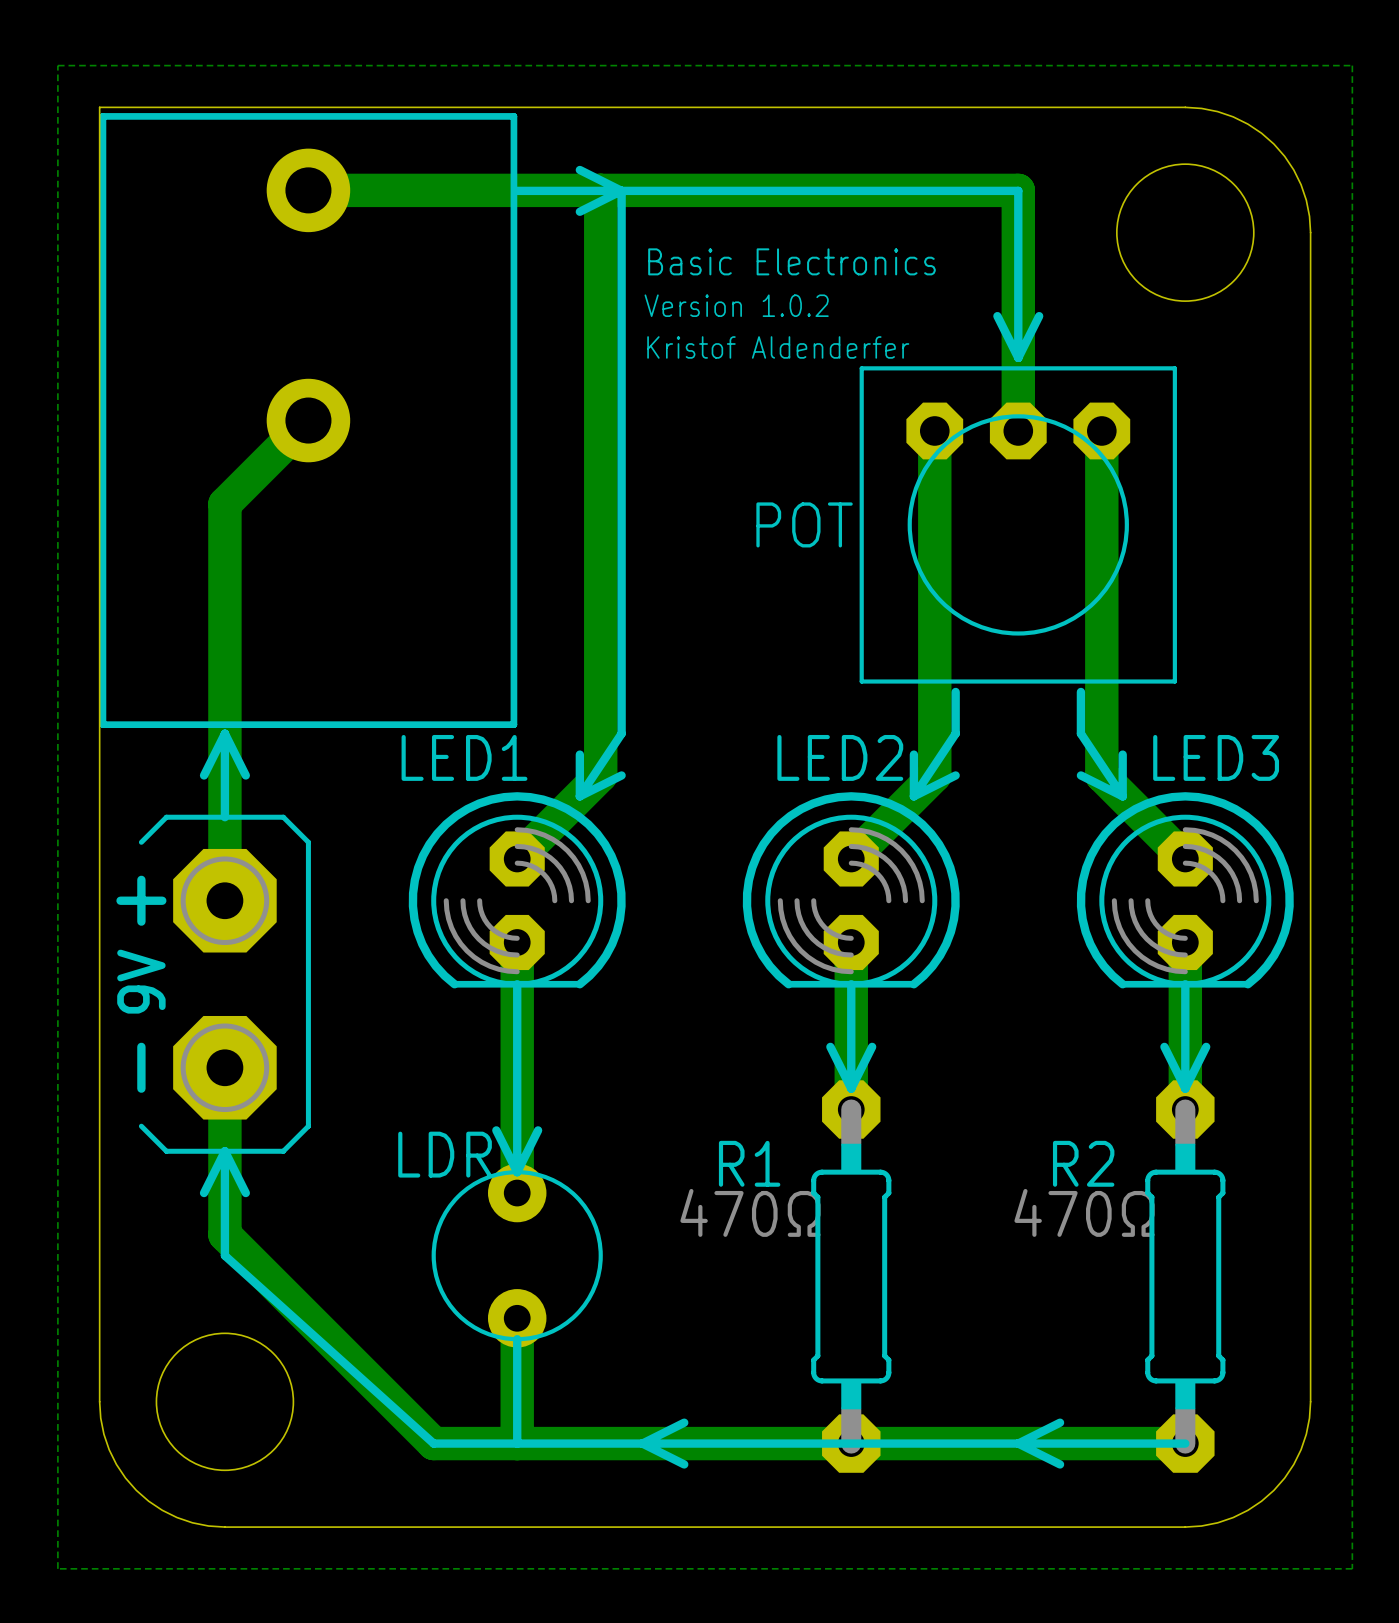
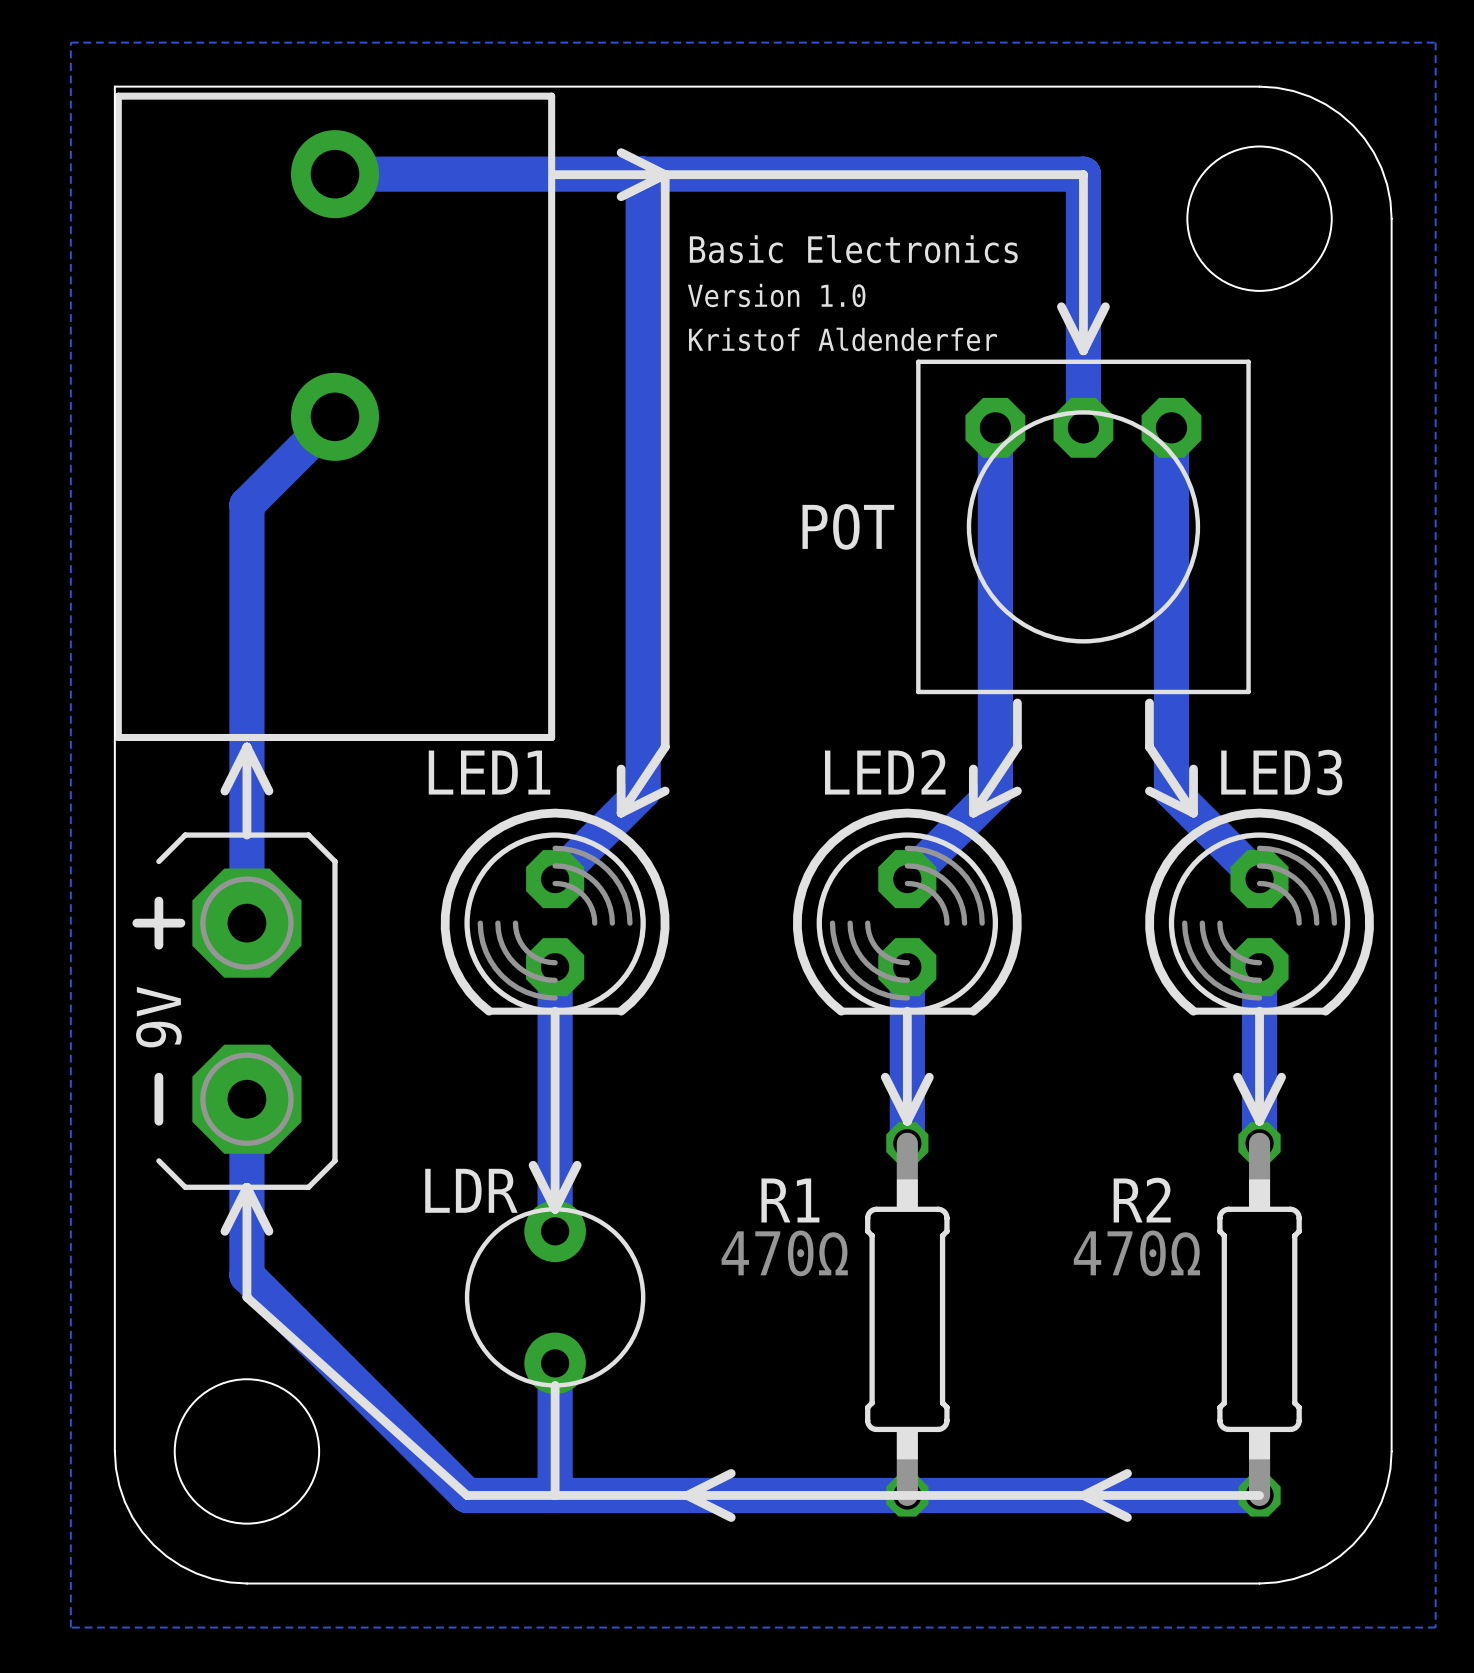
text: Version 1.0.2 (736, 305) -> Version 1.0 (776, 295)
R1 footprint: [811, 1080, 892, 1473] -> [865, 1122, 950, 1517]
R2 footprint: [1145, 1080, 1226, 1473] -> [1217, 1122, 1302, 1517]

